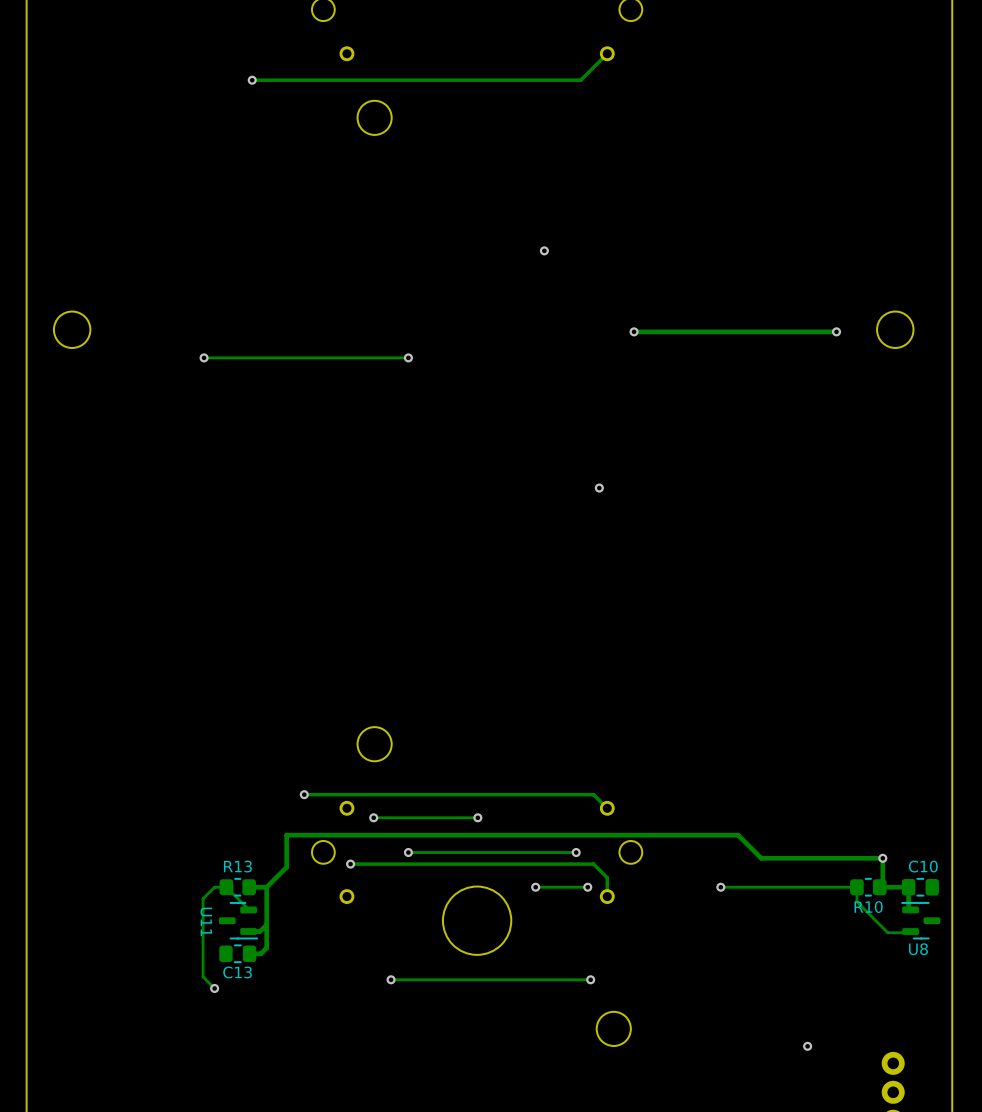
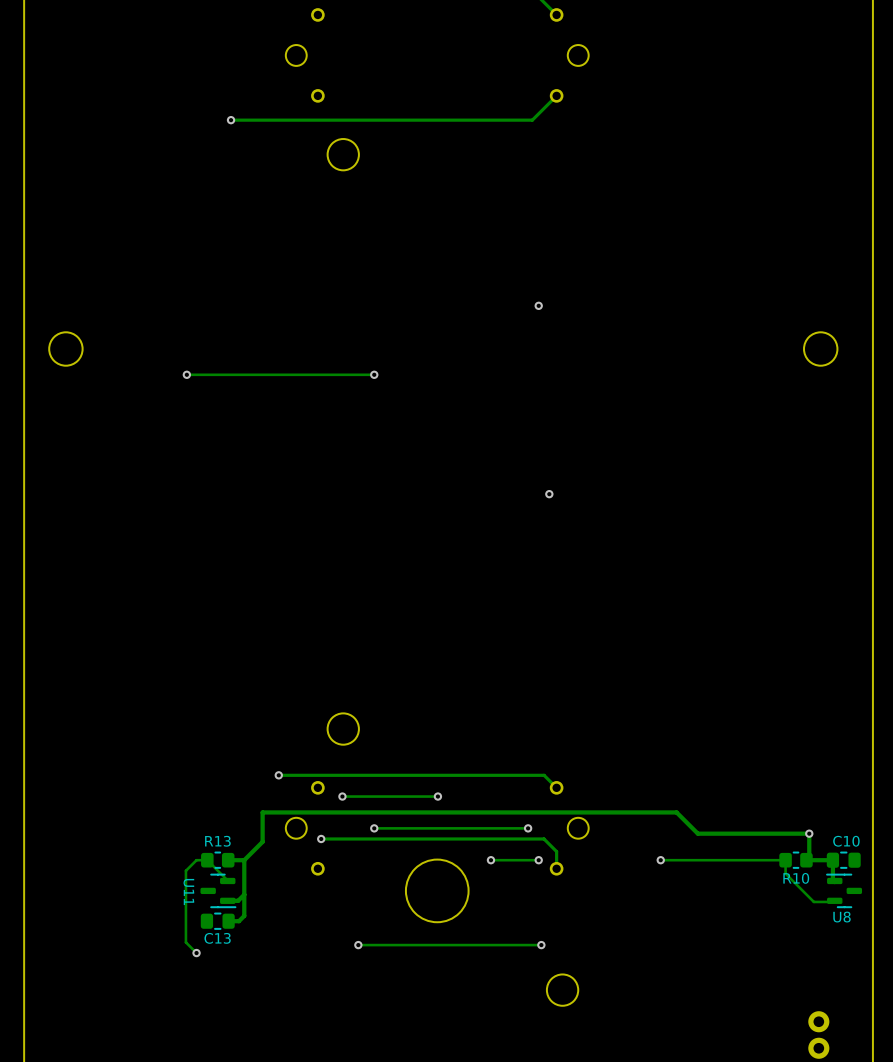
via: (544, 250) -> none
via: none -> (538, 305)
via: (634, 331) -> none
track: (836, 331) (634, 331) -> none
via: (836, 331) -> none
via: (807, 1046) -> none

